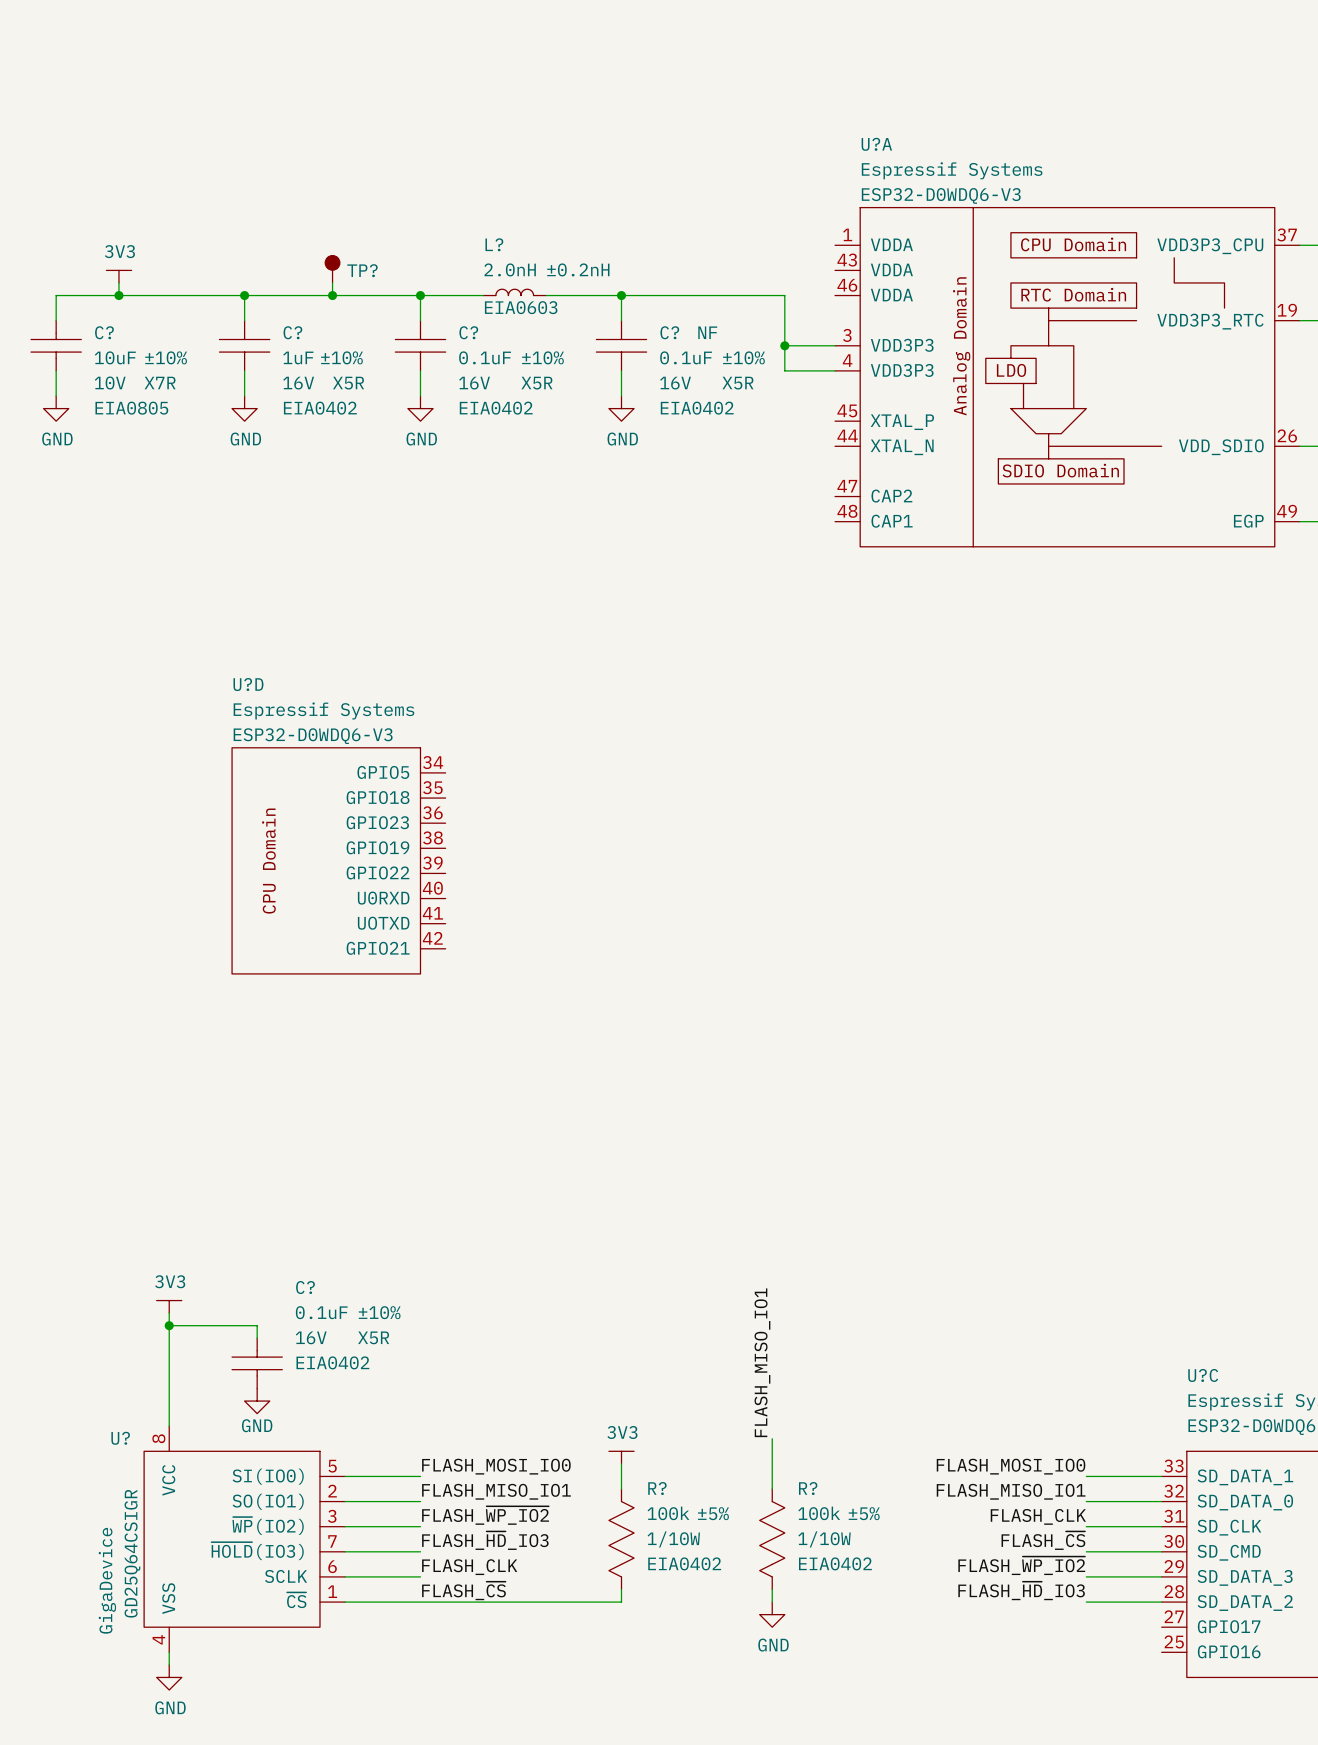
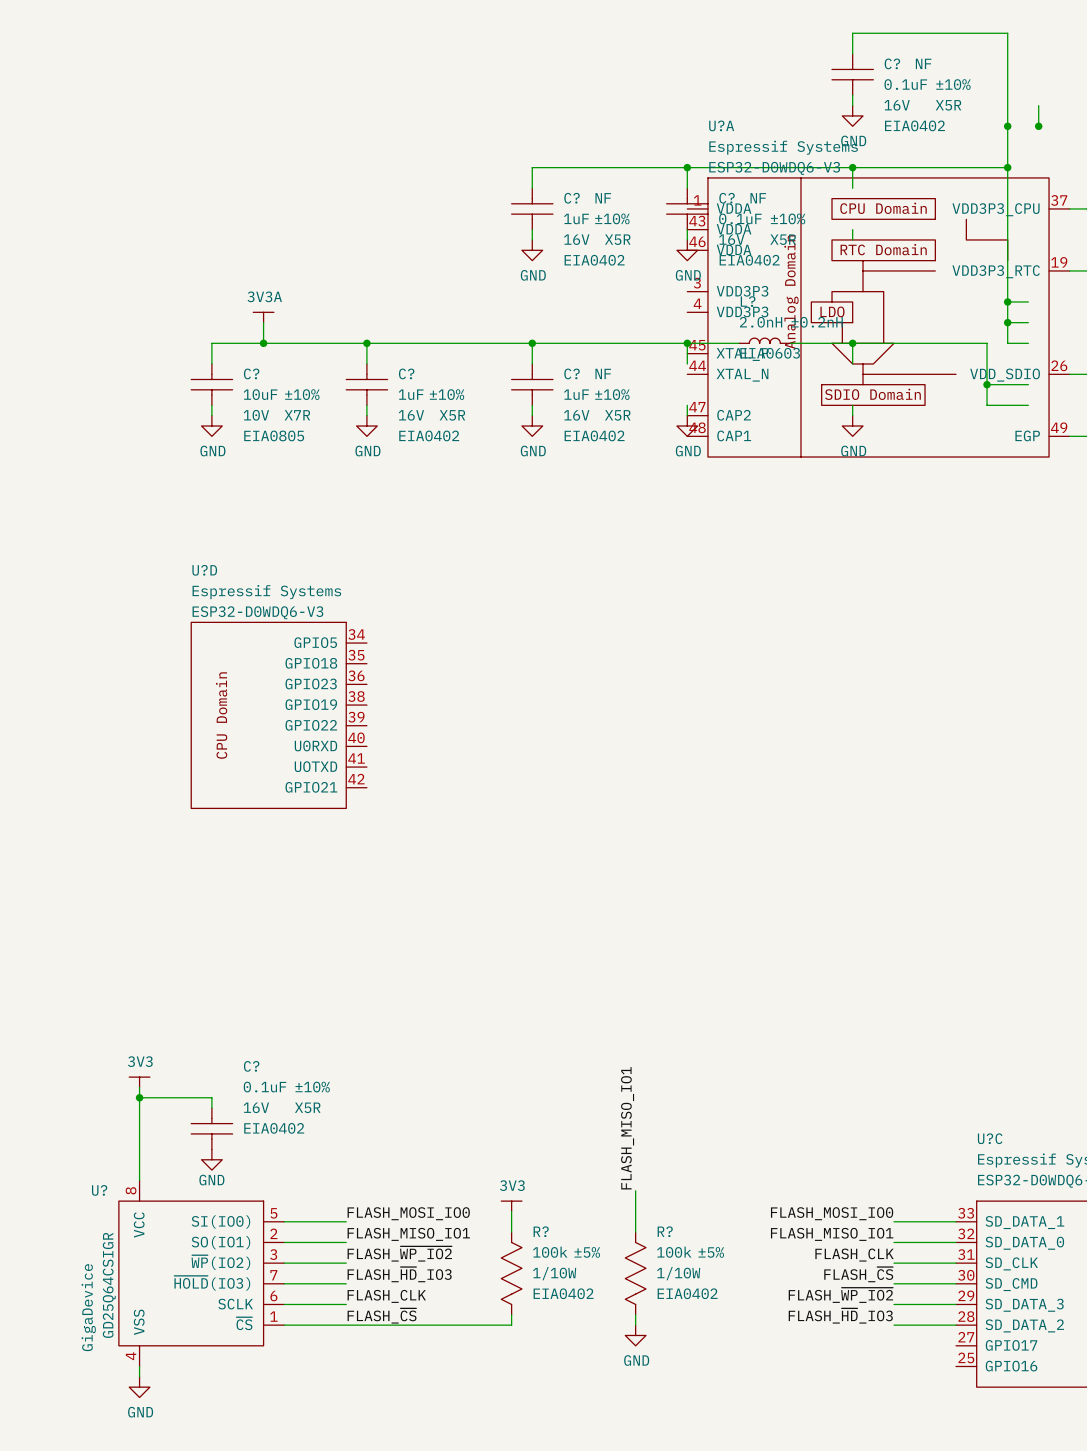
wire: none -> (852, 53) (852, 33) (1007, 33) (1007, 343) (1028, 343)
C?: none -> (852, 74)
wire: none -> (852, 95) (852, 105)
wire: none -> (1038, 105) (1038, 126)
power symbol: none -> GND (852, 115)
junction: none -> (1007, 126)
junction: none -> (1038, 126)
junction: none -> (687, 167)
wire: none -> (852, 167) (852, 188)
junction: none -> (852, 167)
wire: none -> (1007, 167) (532, 167) (532, 188)
junction: none -> (1007, 167)
C?: none -> (532, 208)
TP?: (332, 269) -> none
wire: none -> (532, 229) (532, 239)
wire: none -> (687, 229) (687, 239)
wire: none -> (852, 229) (852, 239)
power symbol: 3V3 (118, 276) -> none
wire: (118, 282) (118, 295) -> none
wire: (332, 282) (332, 295) -> (211, 405) (211, 415)
L?: (514, 292) -> none
junction: (118, 295) -> none
wire: (244, 295) (244, 320) -> none
junction: (244, 295) -> none
junction: (332, 295) -> none
wire: (420, 295) (420, 320) -> none
junction: (420, 295) -> none
wire: (483, 295) (56, 295) (56, 320) -> none
wire: (546, 295) (784, 295) (784, 370) (835, 370) -> none
wire: (621, 295) (621, 320) -> (687, 167) (687, 188)
junction: (621, 295) -> none
power symbol: none -> GND (532, 250)
power symbol: none -> GND (687, 250)
C? position: (56, 345) -> (211, 384)
C? position: (244, 345) -> (366, 384)
C?: (420, 345) -> none
C? position: (621, 345) -> (687, 208)
wire: (784, 345) (835, 345) -> none
junction: (784, 345) -> none
wire: none -> (1007, 301) (1028, 301)
junction: none -> (1007, 301)
wire: (56, 370) (56, 396) -> none
wire: (244, 370) (244, 396) -> (263, 322) (263, 343)
wire: (420, 370) (420, 396) -> (366, 343) (366, 363)
wire: (621, 370) (621, 396) -> (532, 343) (532, 363)
power symbol: none -> 3V3A (263, 317)
wire: none -> (1007, 322) (1028, 322)
junction: none -> (1007, 322)
L?: none -> (764, 340)
power symbol: GND (56, 408) -> none
power symbol: GND (244, 408) -> none
junction: none -> (263, 343)
power symbol: GND (420, 408) -> none
junction: none -> (366, 343)
power symbol: GND (621, 408) -> none
junction: none -> (532, 343)
wire: none -> (687, 343) (687, 363)
junction: none -> (687, 343)
wire: none -> (738, 343) (211, 343) (211, 363)
wire: none -> (790, 343) (987, 343) (987, 405) (1028, 405)
wire: none -> (852, 343) (852, 363)
junction: none -> (852, 343)
C?: none -> (532, 384)
wire: none -> (987, 384) (1028, 384)
junction: none -> (987, 384)
wire: none -> (366, 405) (366, 415)
wire: none -> (532, 405) (532, 415)
wire: none -> (687, 405) (687, 415)
wire: none -> (852, 405) (852, 415)
power symbol: none -> GND (211, 426)
power symbol: none -> GND (366, 426)
power symbol: none -> GND (532, 426)
power symbol: none -> GND (687, 426)
power symbol: none -> GND (852, 426)

